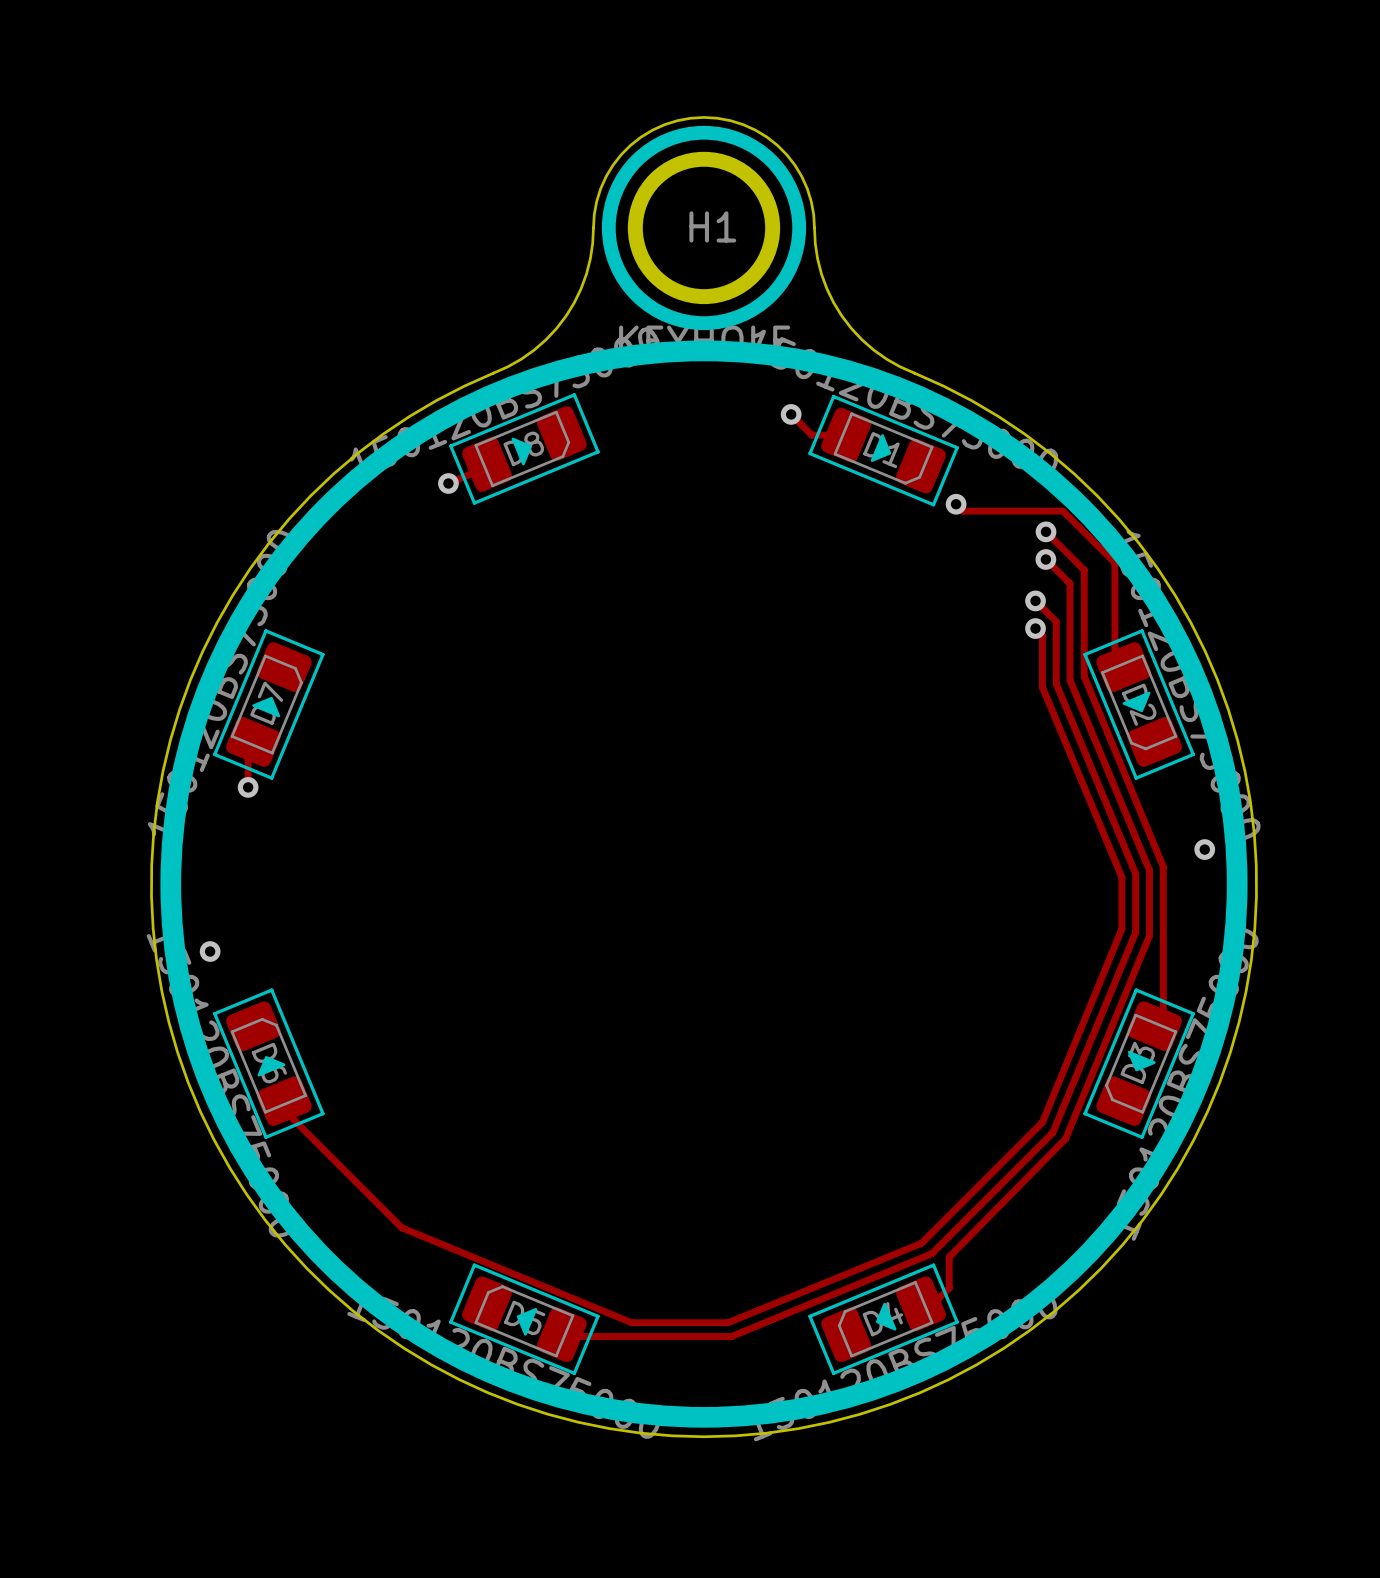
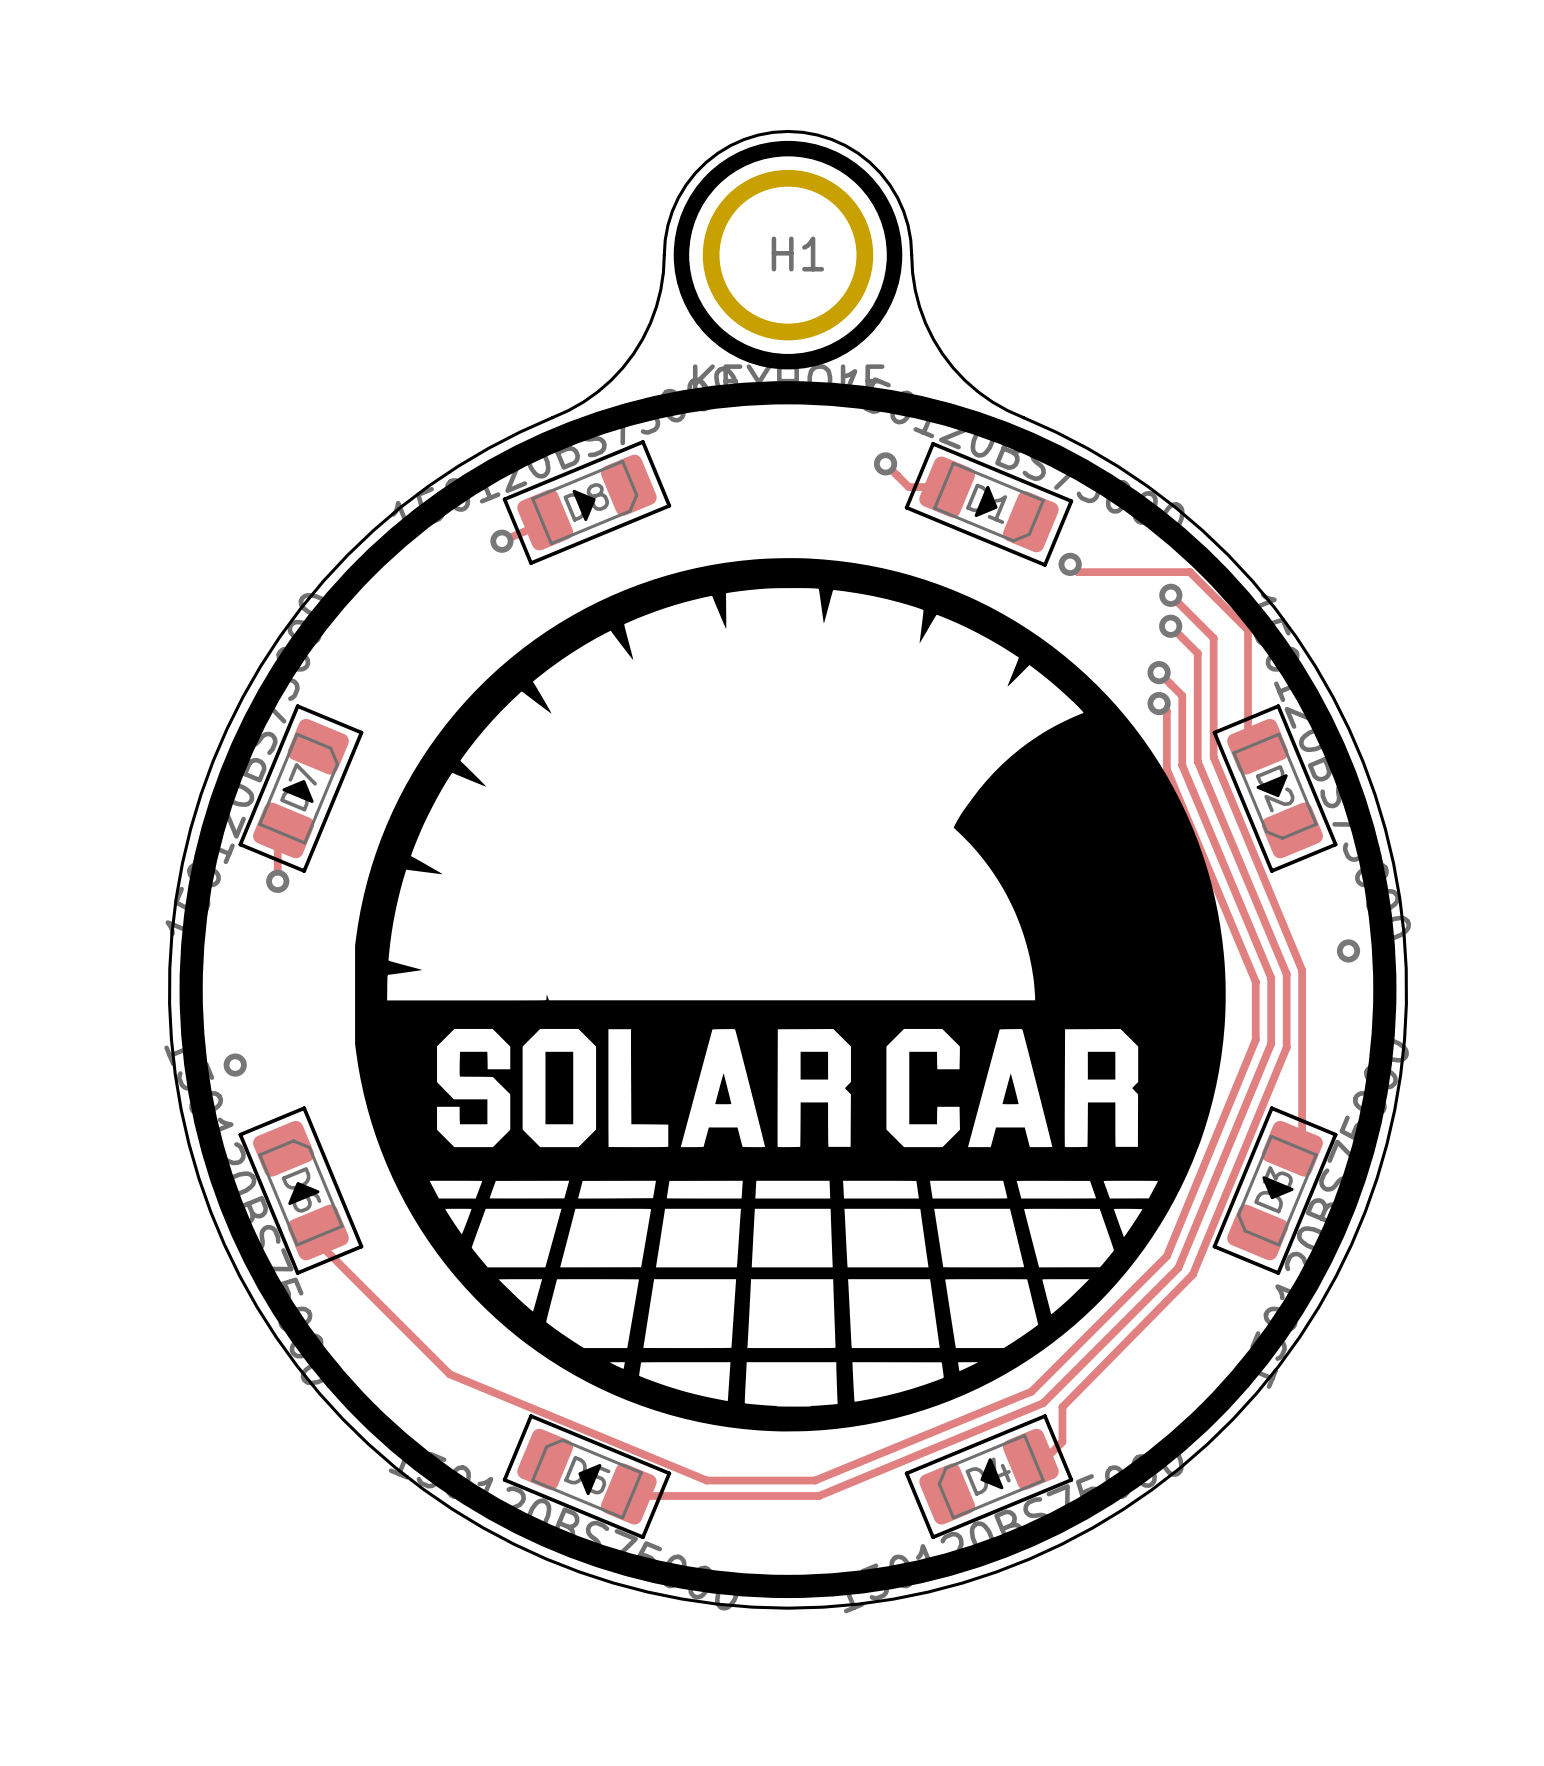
part: none -> (790, 994)

